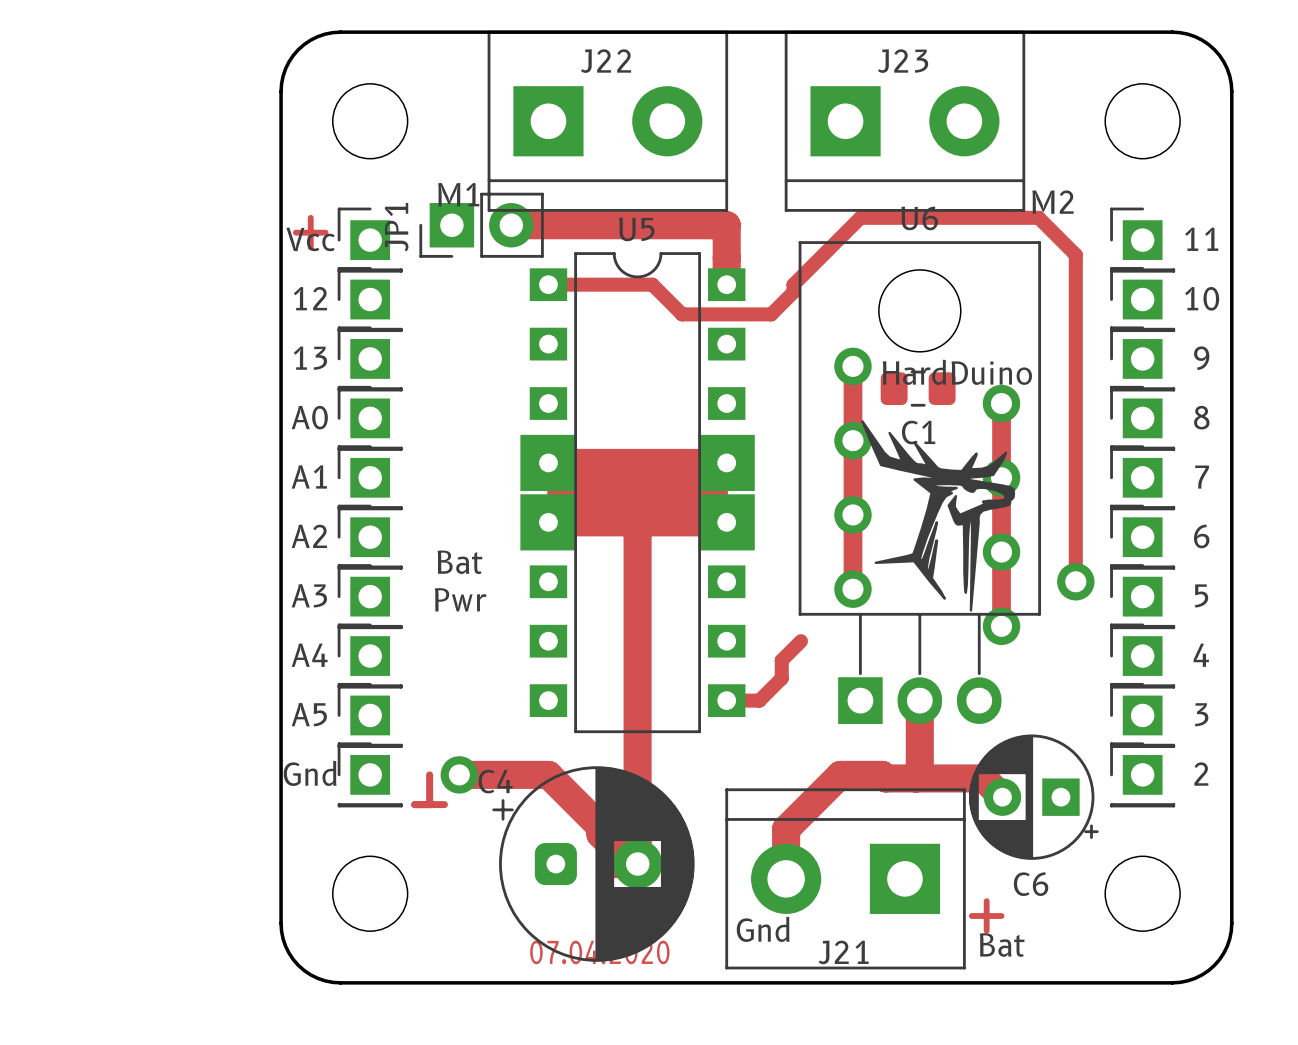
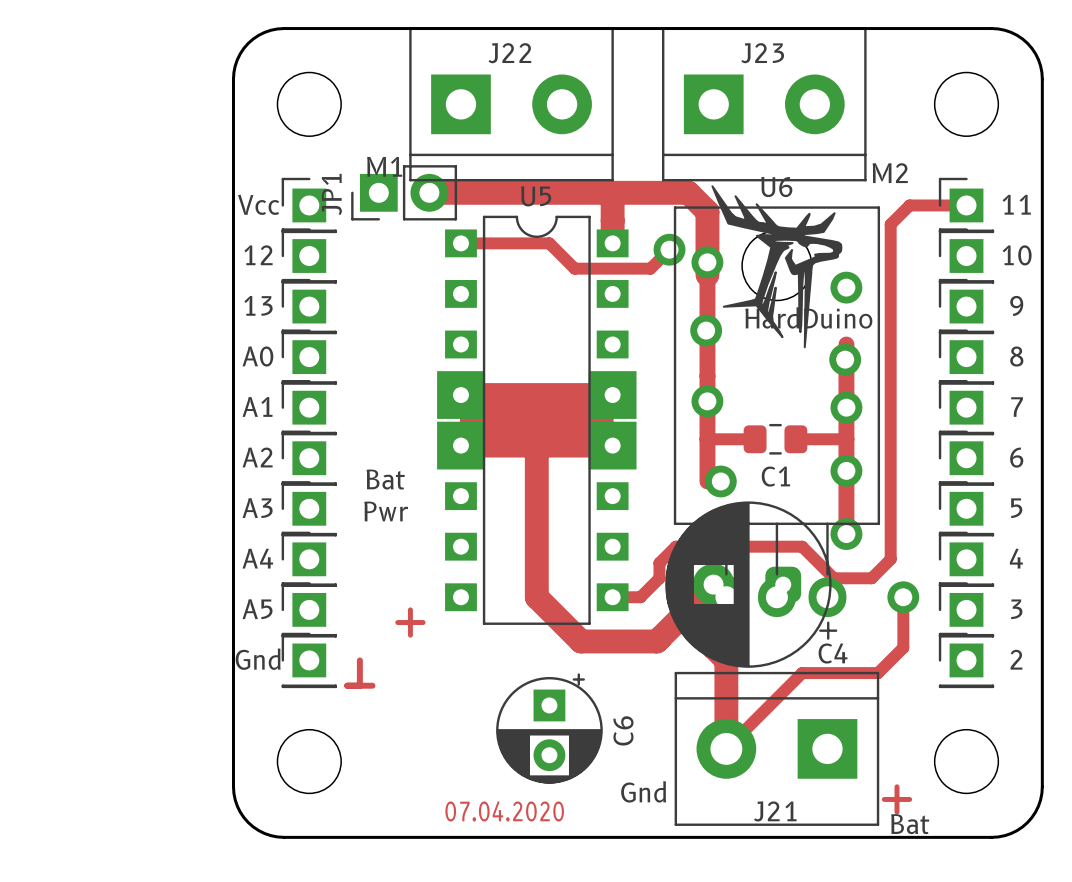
track: (310, 217) (310, 247) -> (410, 609) (410, 635)
track: none -> (612, 192) (688, 192) (707, 211) (707, 481)
track: (295, 232) (325, 232) -> (397, 622) (423, 622)
track: none -> (966, 205) (909, 205) (890, 224) (890, 559) (871, 578) (833, 578) (802, 546) (675, 546)
track: (793, 292) (793, 284) (860, 217) (1038, 217) (1075, 254) (1075, 581) -> none
via: none -> (669, 249)
via: none -> (707, 262)
via: none -> (846, 287)
track: (852, 366) (852, 589) -> none
via position: (852, 366) -> (706, 330)
C1 position: (918, 388) -> (775, 439)
via position: (1001, 403) -> (845, 359)
via: (852, 440) -> none
via: none -> (707, 401)
track: none -> (707, 439) (755, 439)
via: (852, 514) -> none
track: none -> (795, 439) (846, 439)
drawing position: (938, 515) -> (776, 266)
via: none -> (720, 481)
via: (1075, 581) -> none
via: (852, 589) -> none
track: (637, 700) (637, 829) -> (536, 597) (581, 641) (656, 641) (713, 584) (713, 647) (726, 660) (726, 748) (802, 673) (878, 673) (903, 647) (903, 597)
track: (919, 700) (919, 774) (915, 778) -> none
via: none -> (903, 597)
track: (459, 774) (548, 774) (600, 826) (600, 834) (615, 849) (615, 864) (637, 864) (637, 829) -> none
via: (459, 774) -> none
track: (1002, 797) (983, 778) (885, 778) (882, 774) (840, 774) (786, 829) (786, 878) -> none
C6 rotation: 0° (1033, 797) -> 90° counterclockwise (549, 728)
C6 position: (1033, 797) -> (549, 728)
C4 rotation: 0° (593, 864) -> 180° (751, 584)
C4 position: (593, 864) -> (751, 584)
J21 position: (845, 878) -> (776, 748)
track: (986, 901) (986, 930) -> (896, 786) (896, 812)
track: (971, 916) (1001, 916) -> (884, 799) (909, 799)
text position: Bat (1002, 945) -> Bat (910, 824)

